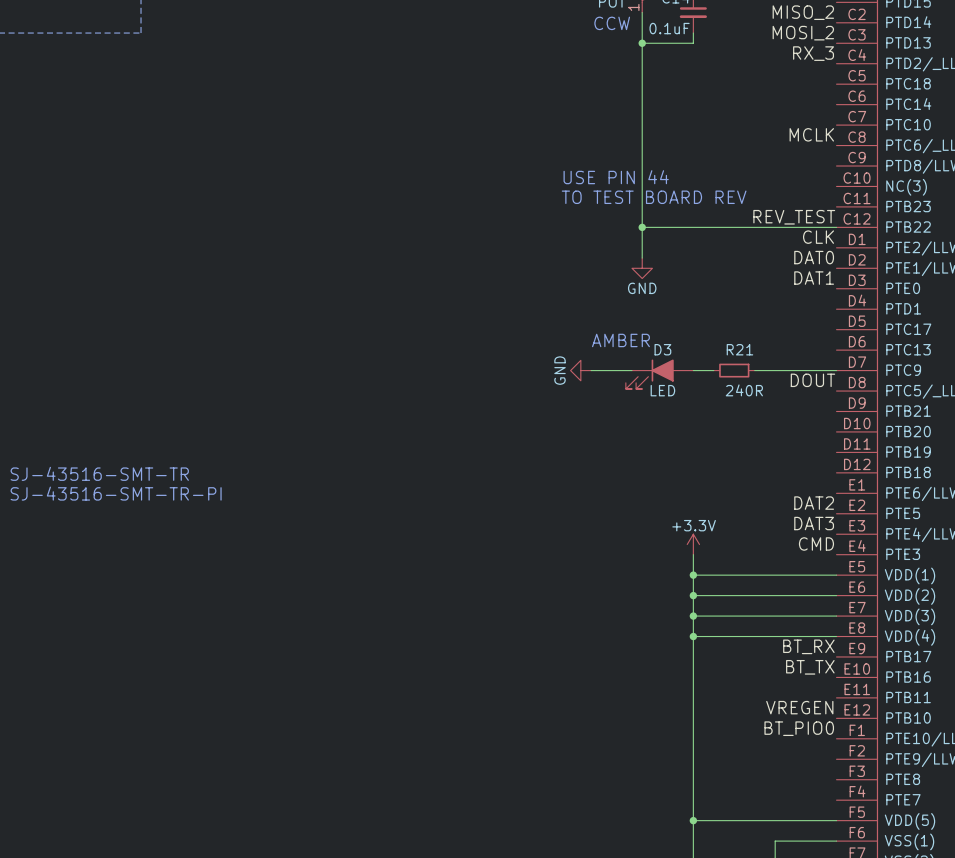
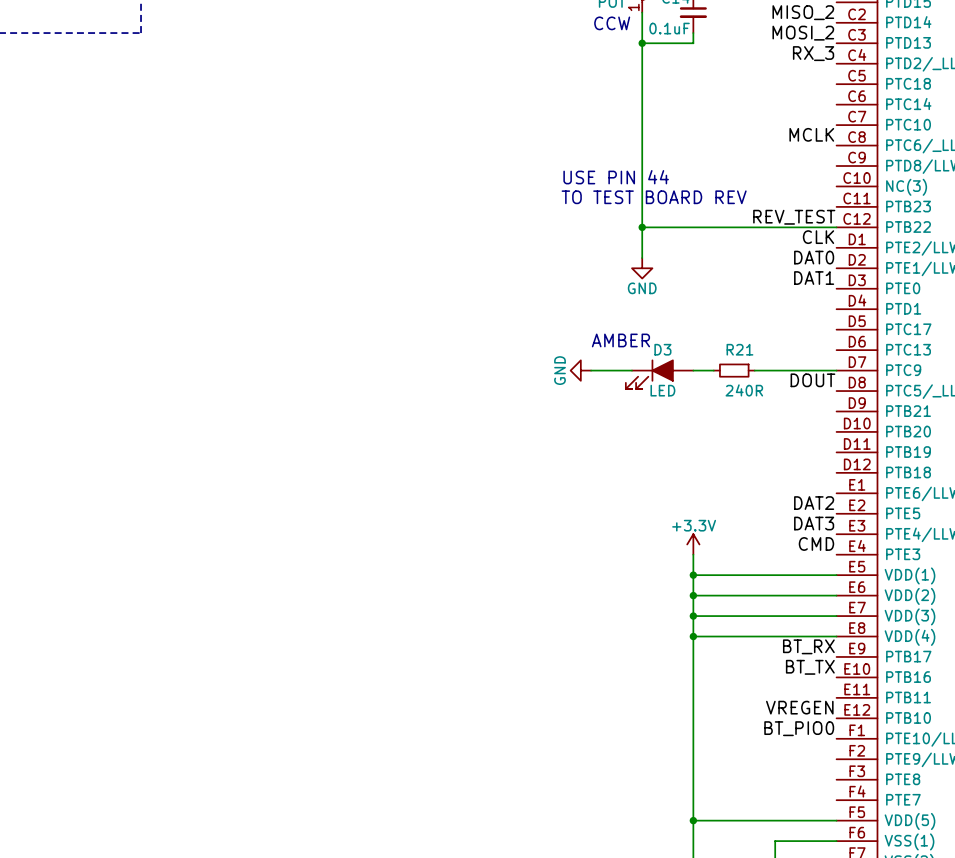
text: SJ-43516-SMT-TR (99, 473) -> none
text: SJ-43516-SMT-TR-PI (116, 493) -> none

